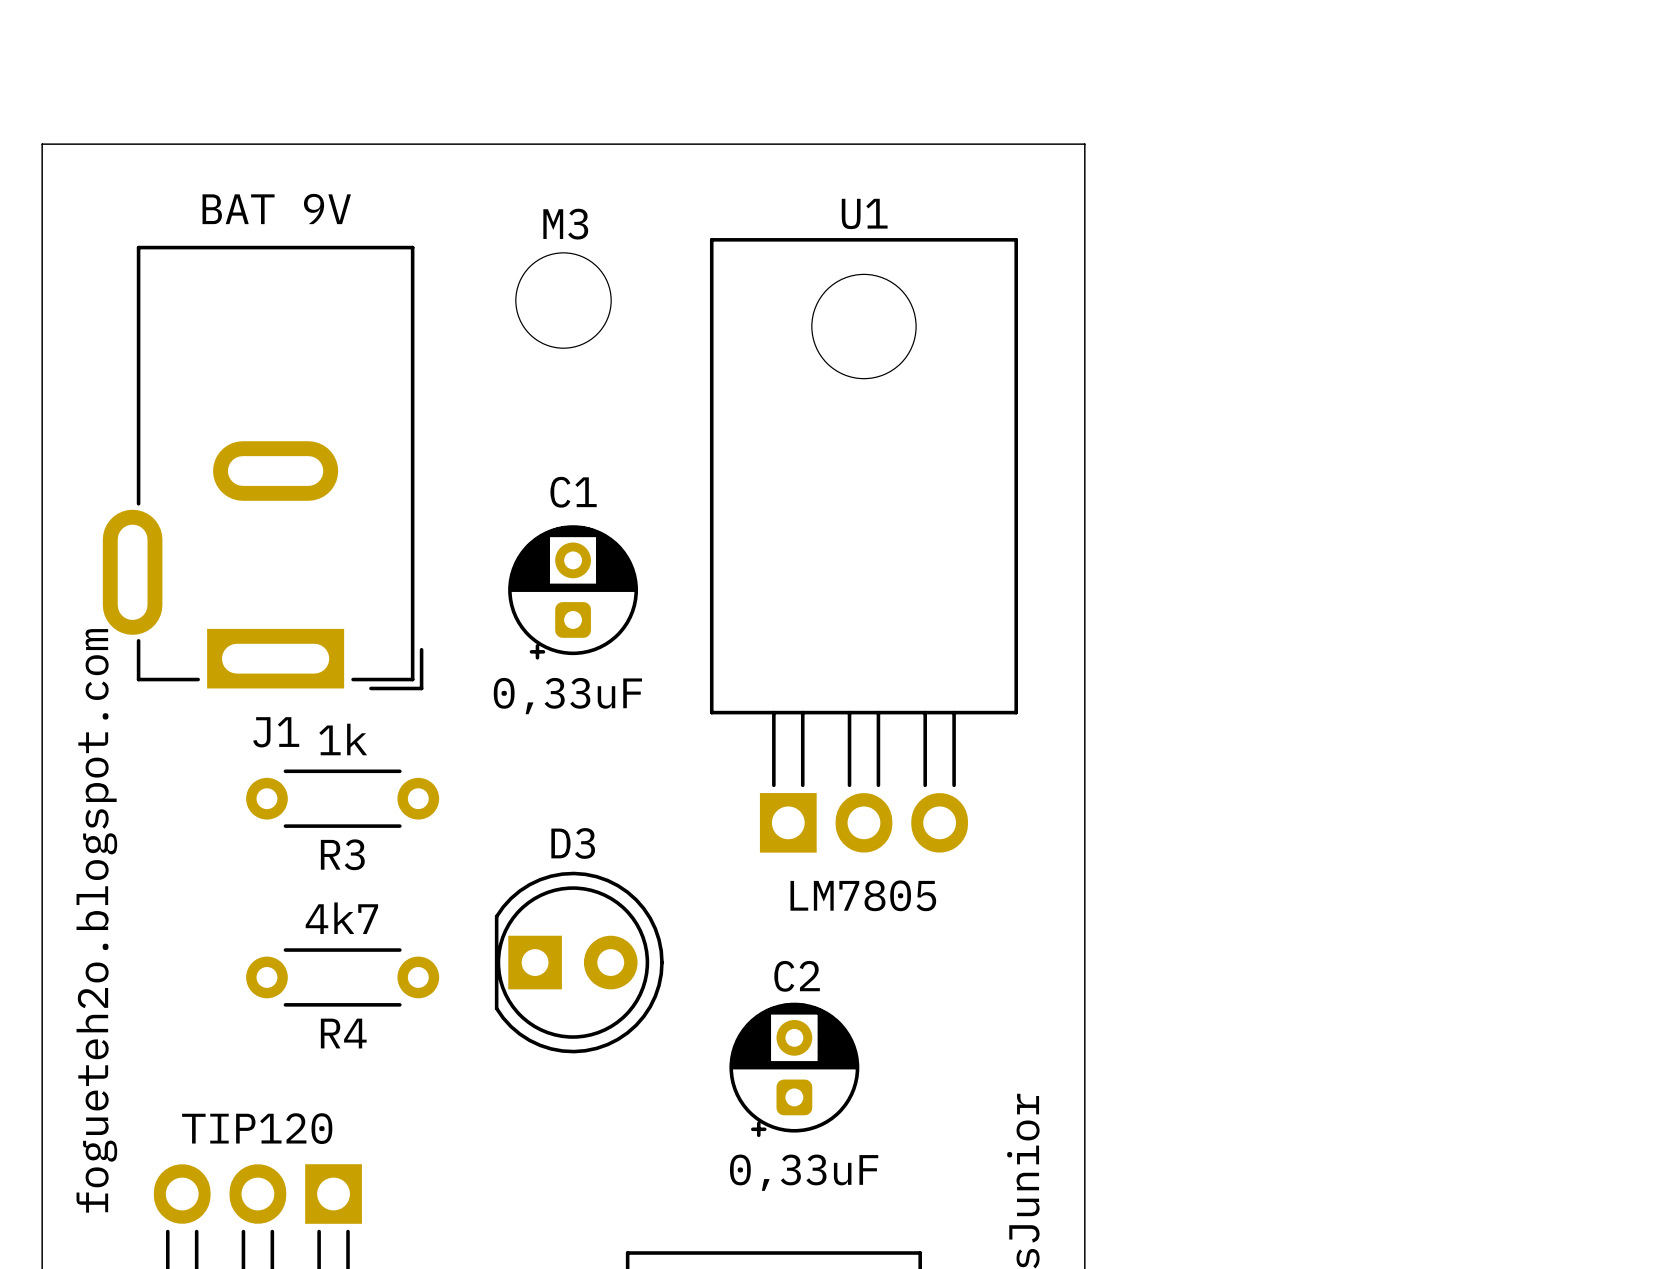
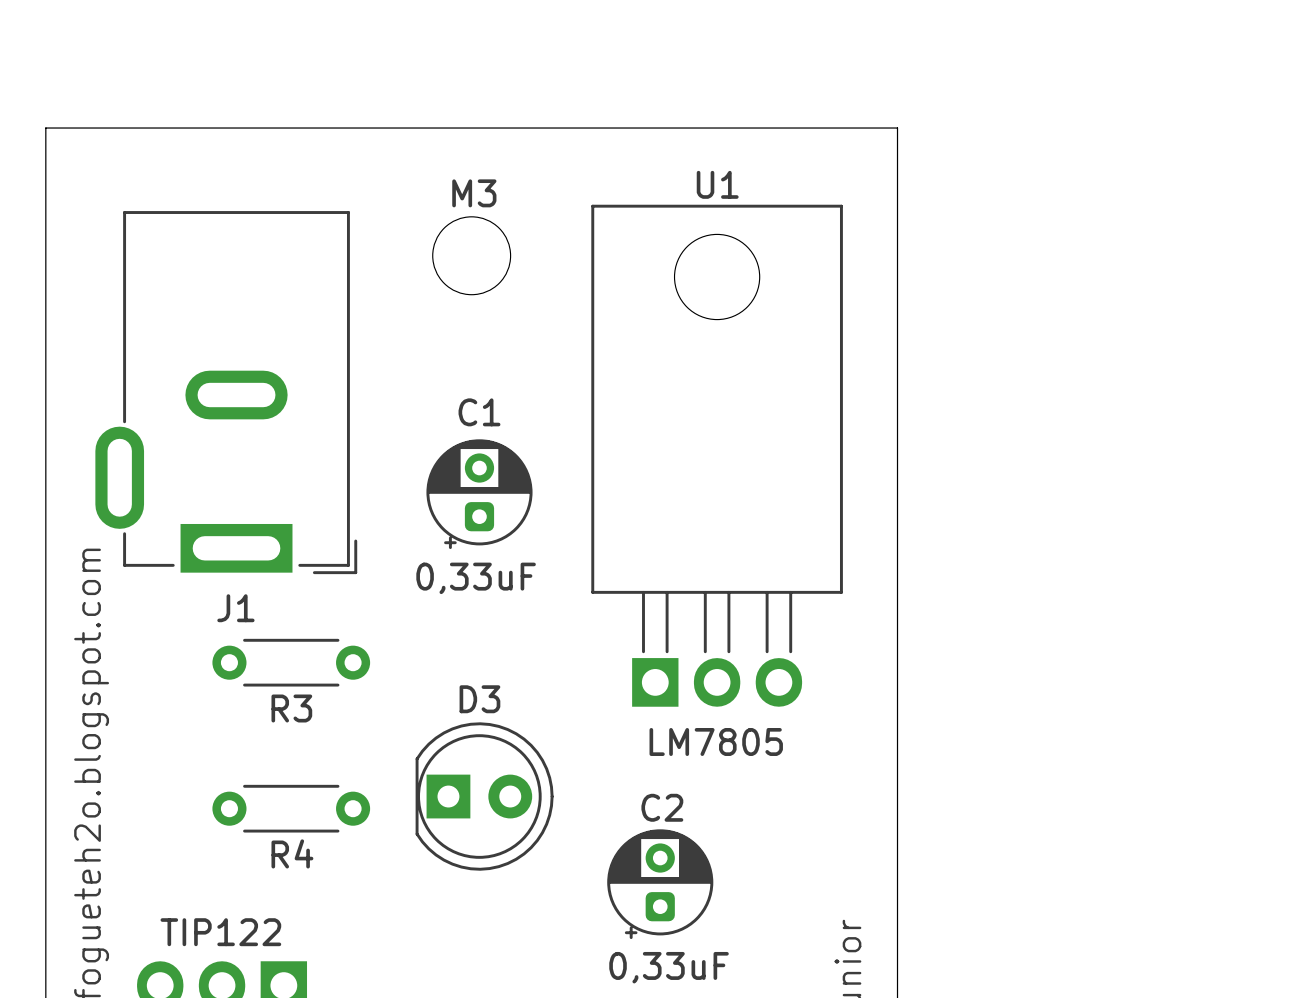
J1 value: BAT 9V (276, 208) -> none
R3 value: 1k (343, 739) -> none
R4 value: 4k7 (341, 918) -> none
part value: TIP120 (257, 1128) -> TIP122 (220, 932)

